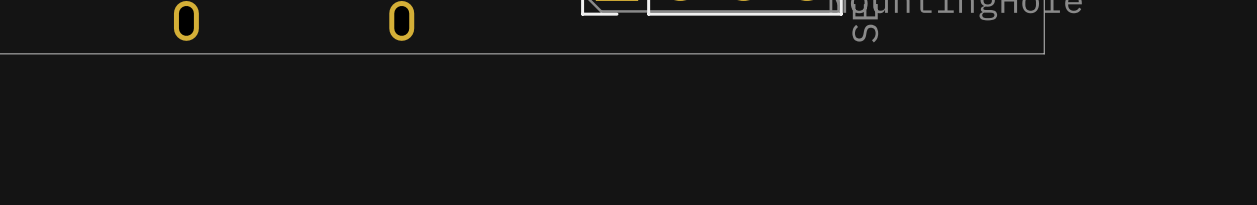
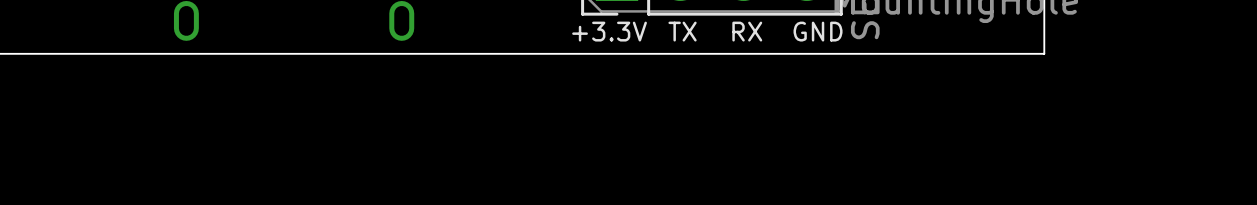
text: none -> +3.3V (609, 31)
text: none -> TX (682, 31)
text: none -> RX (747, 31)
text: none -> GND (818, 31)

